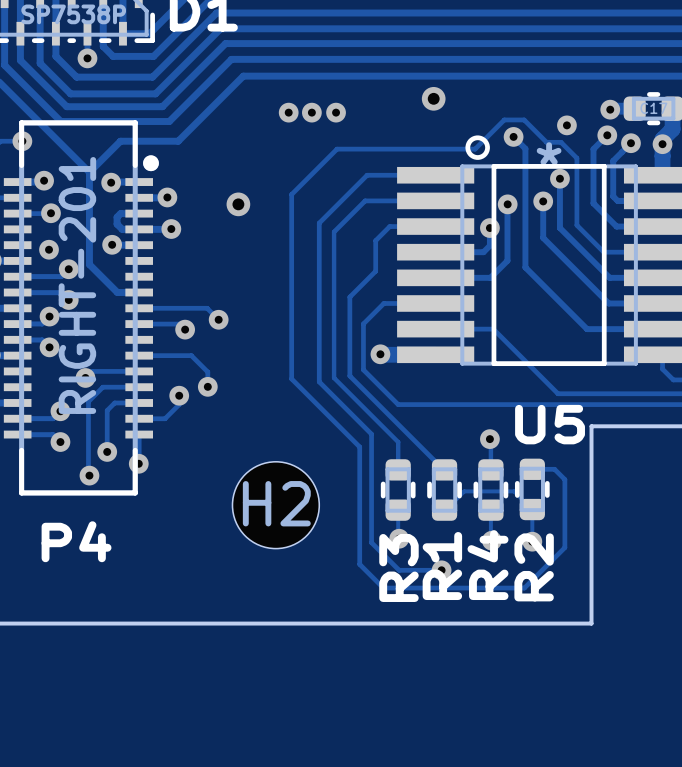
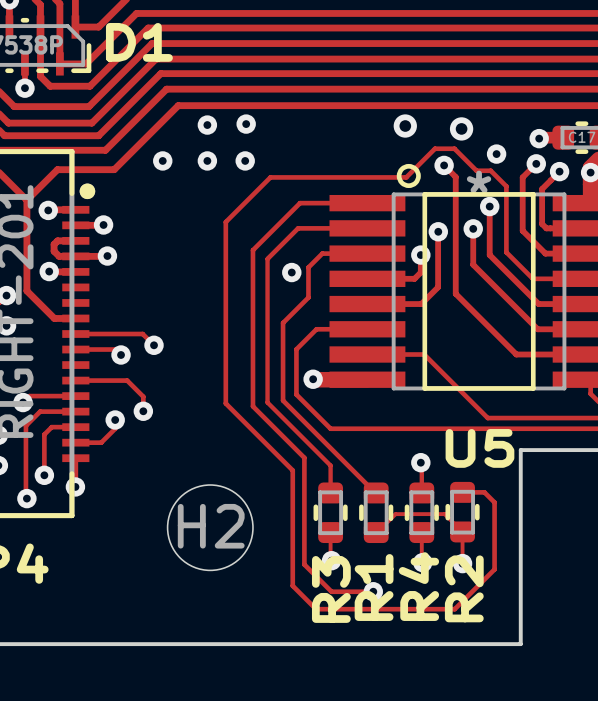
via: none -> (246, 124)
via: none -> (207, 125)
via position: (433, 98) -> (405, 126)
via: none -> (461, 128)
via: (288, 112) -> none
via: (311, 112) -> none
via: (336, 112) -> none
via: none -> (162, 160)
via: none -> (207, 160)
via: none -> (245, 160)
via: (238, 204) -> none
via: none -> (291, 272)

